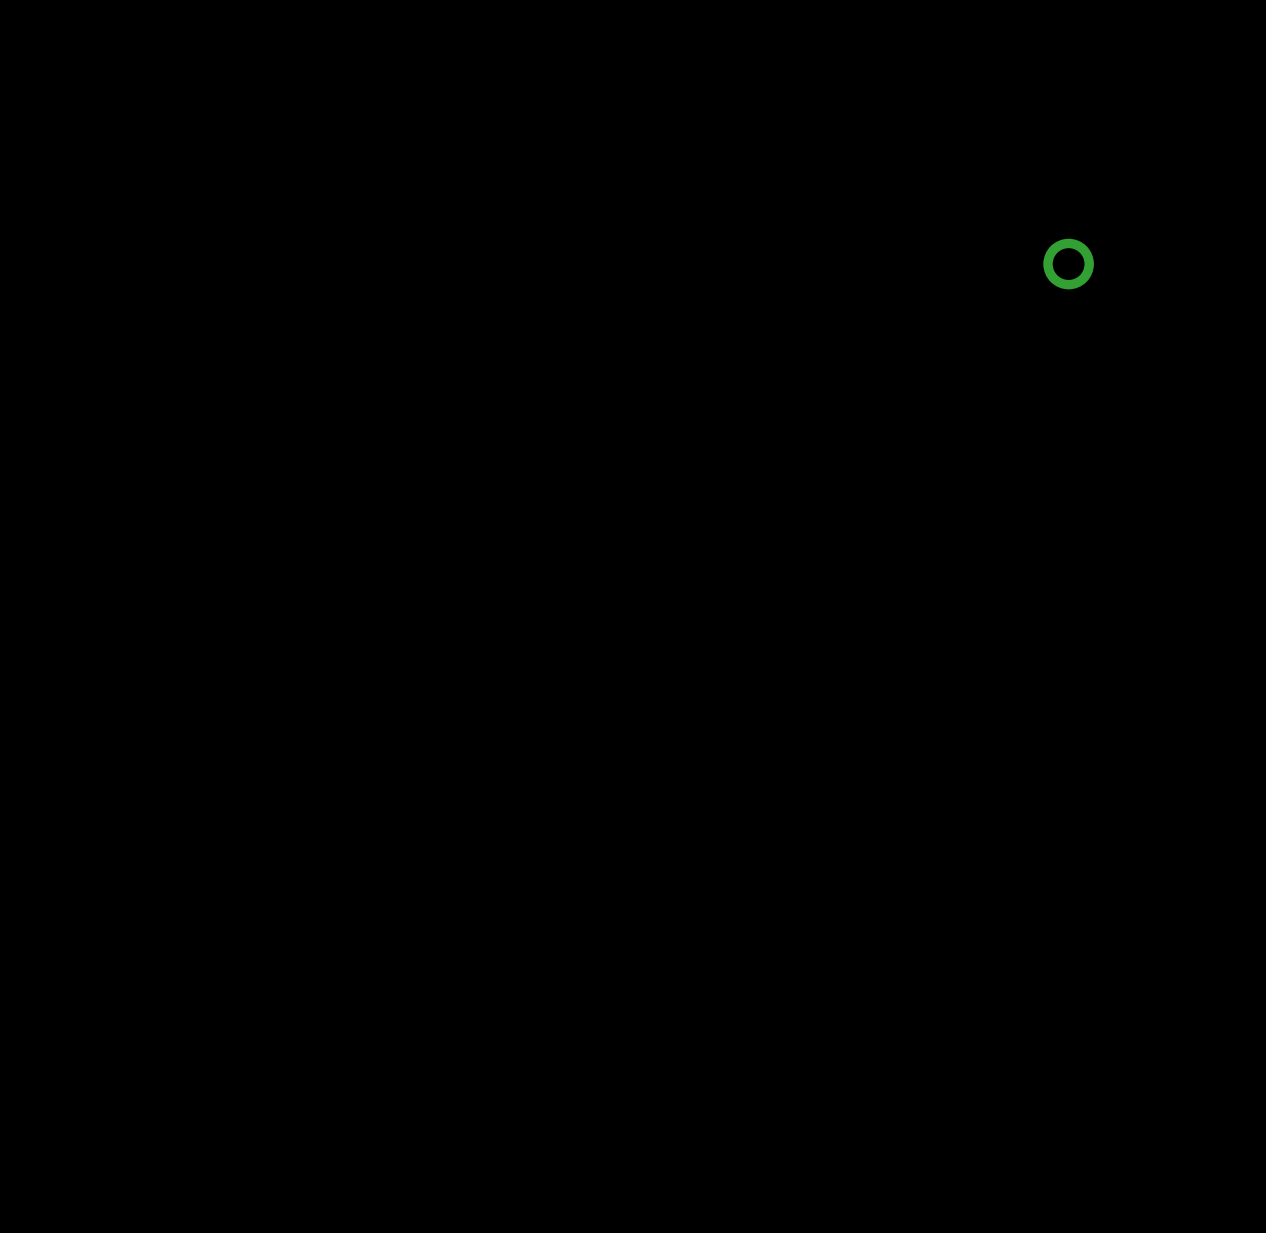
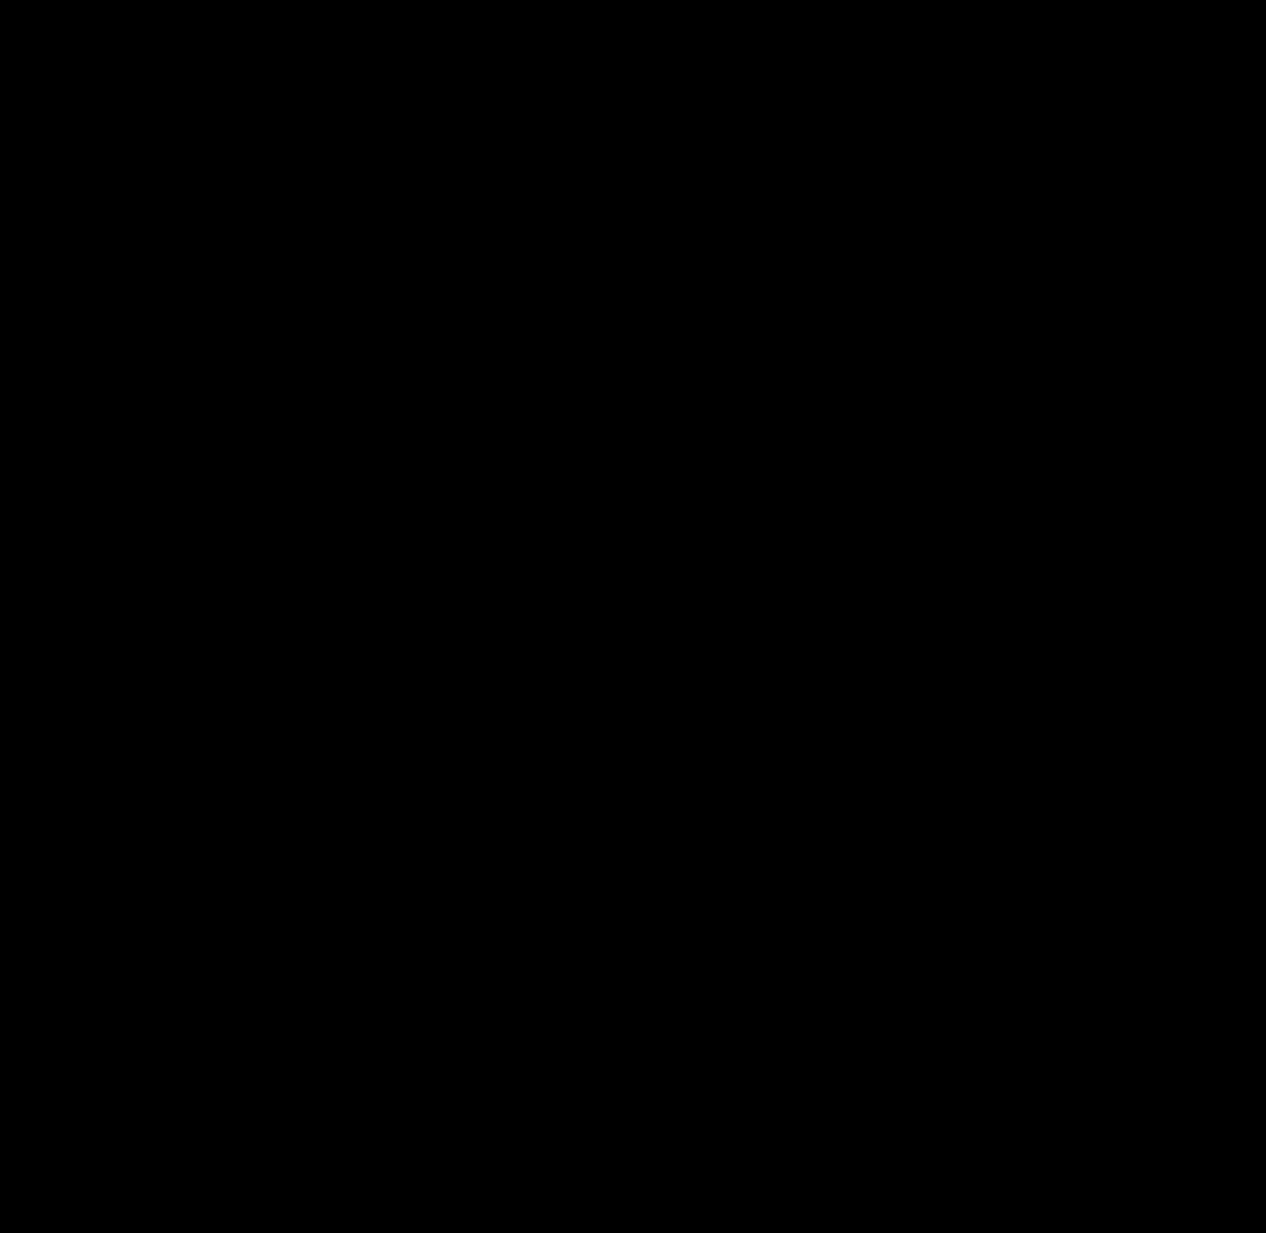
via: (1068, 264) -> none

